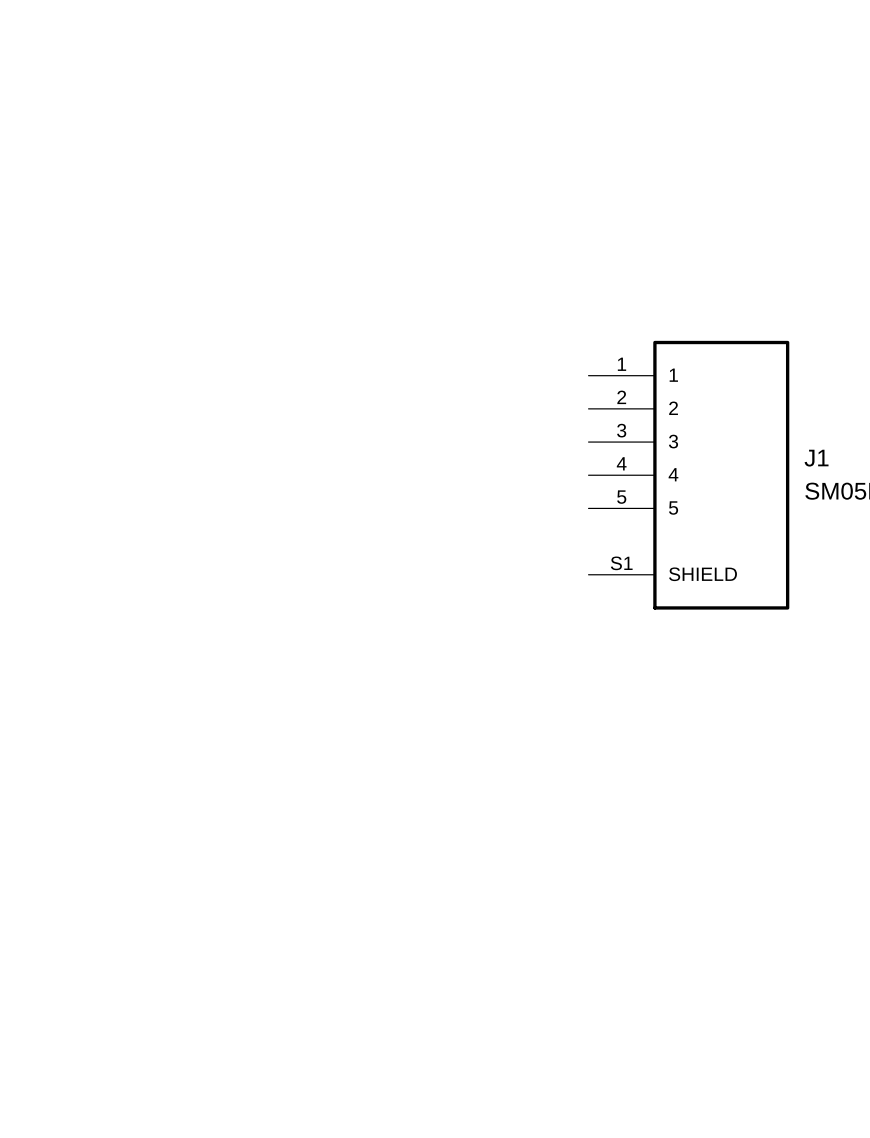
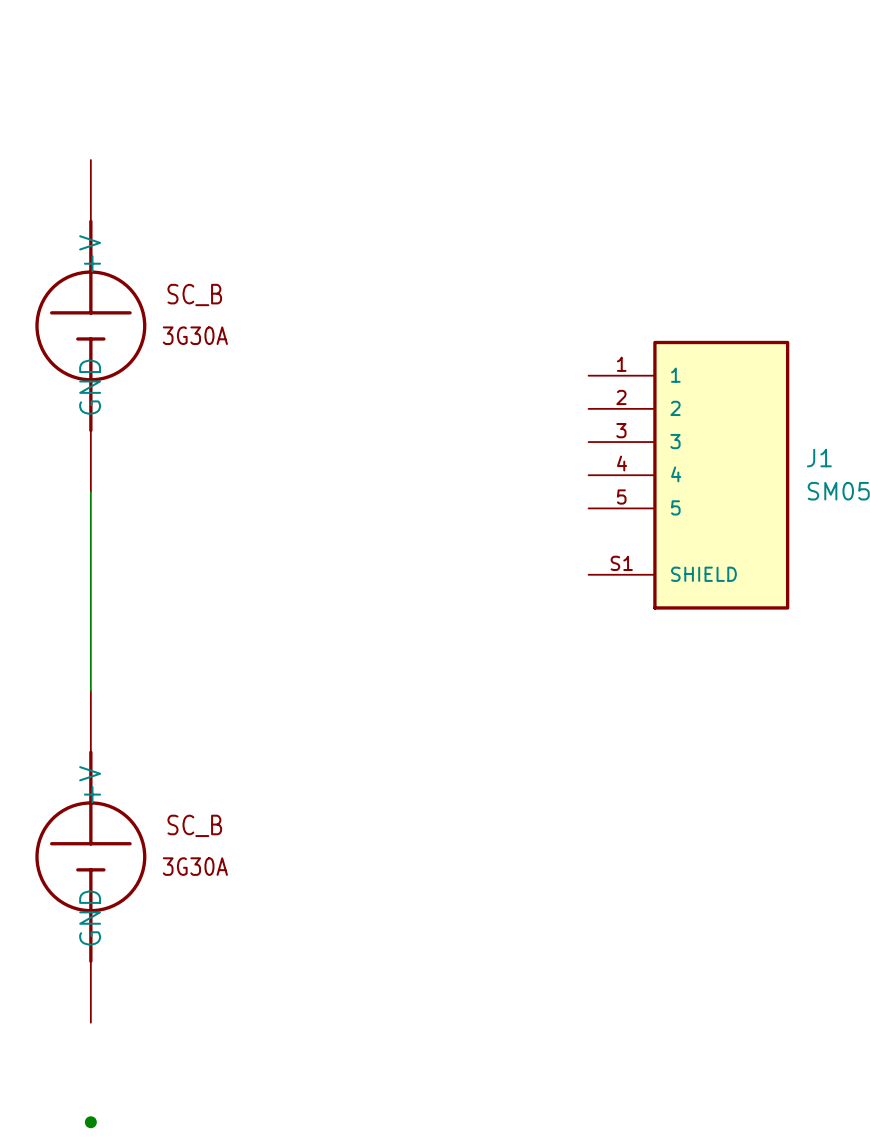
part: none -> (90, 325)
wire: none -> (90, 491) (90, 690)
part: none -> (90, 856)
junction: none -> (90, 1122)

